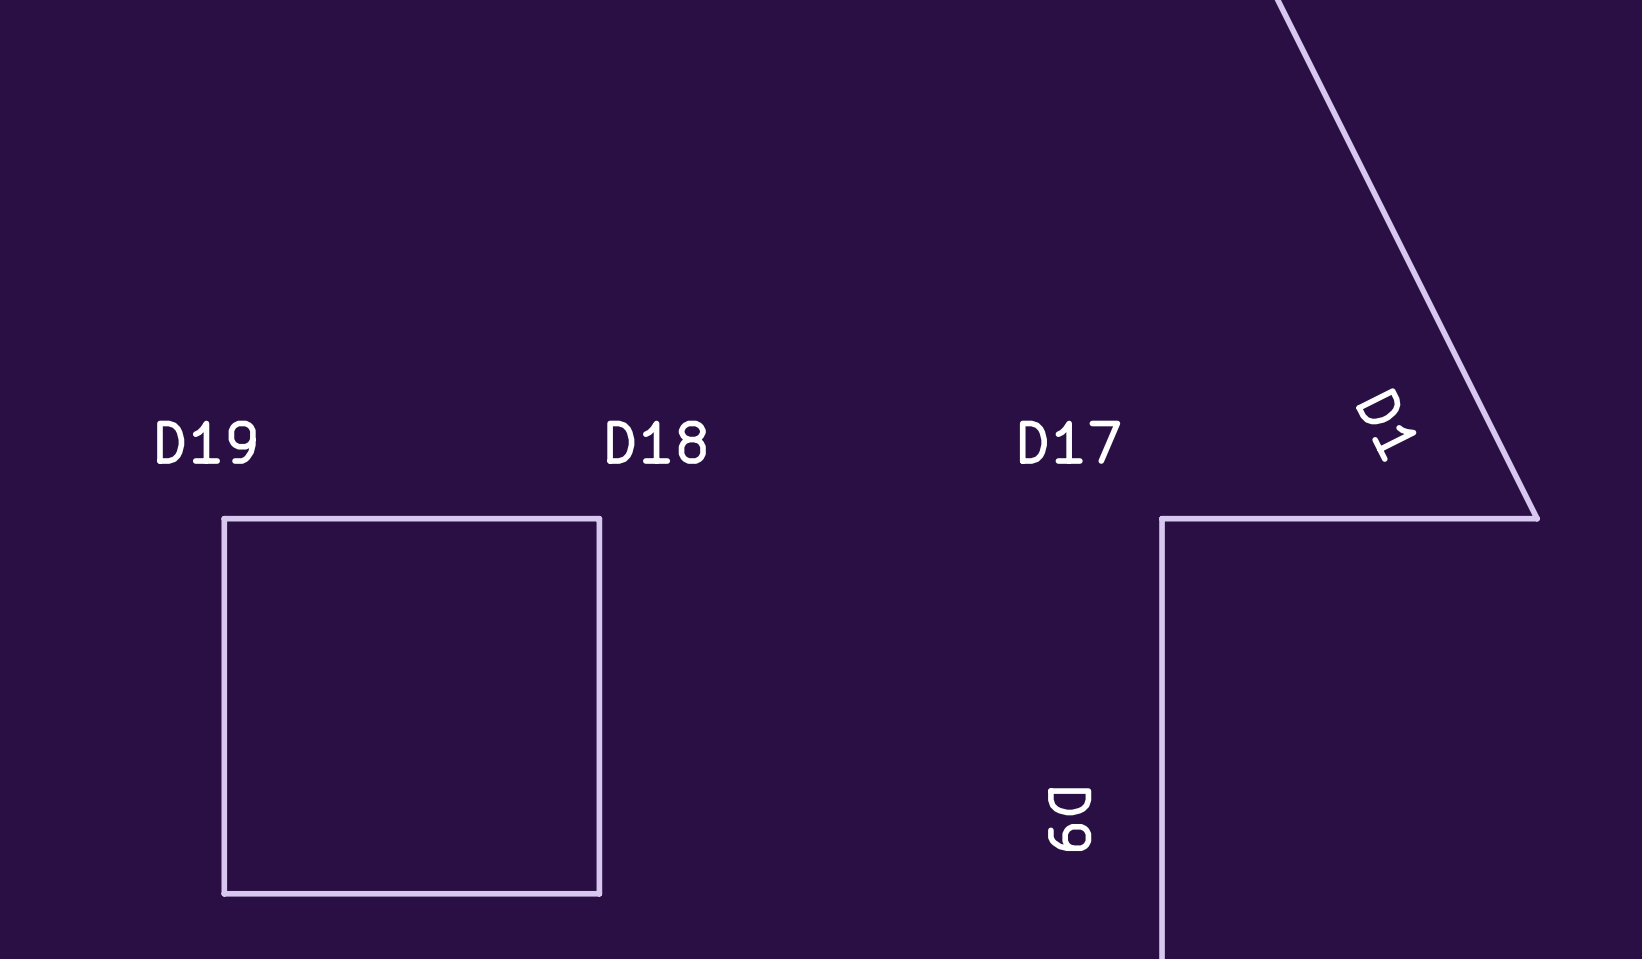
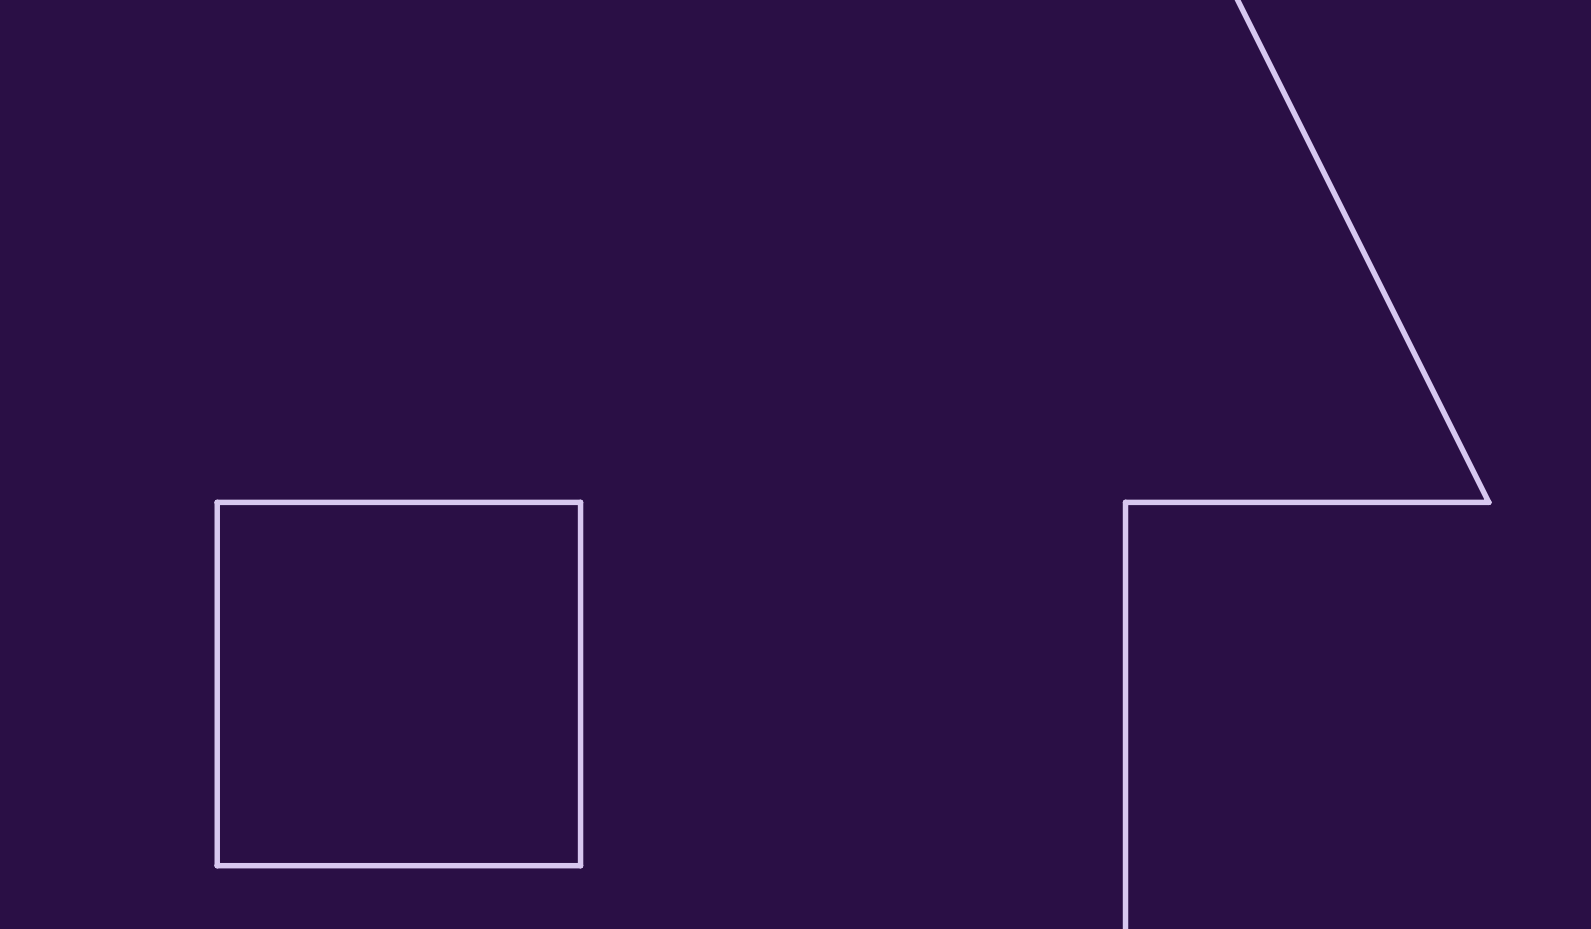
D1: (1386, 425) -> none
D19: (206, 442) -> none
D18: (656, 442) -> none
D17: (1070, 442) -> none
D9: (1069, 819) -> none

